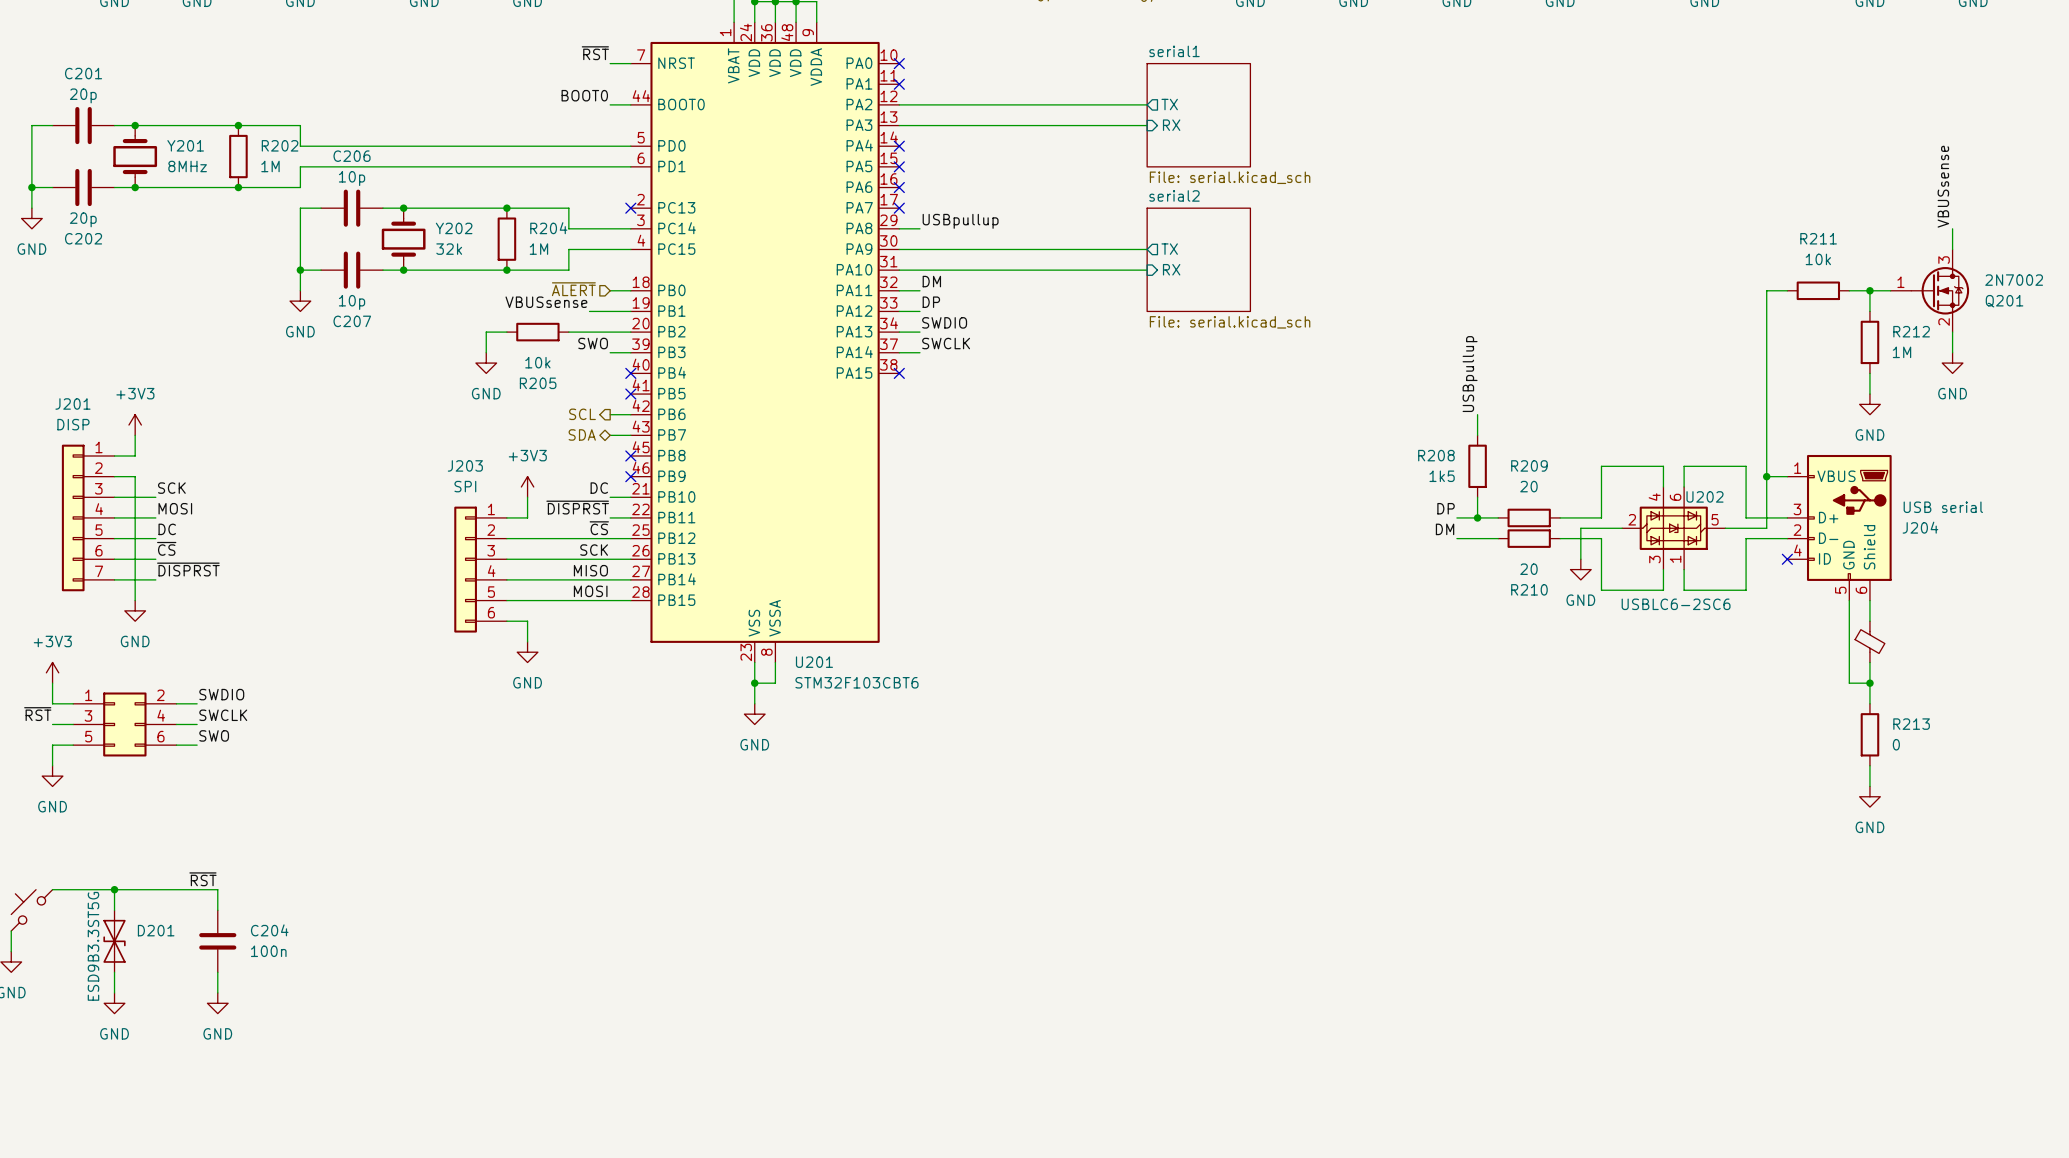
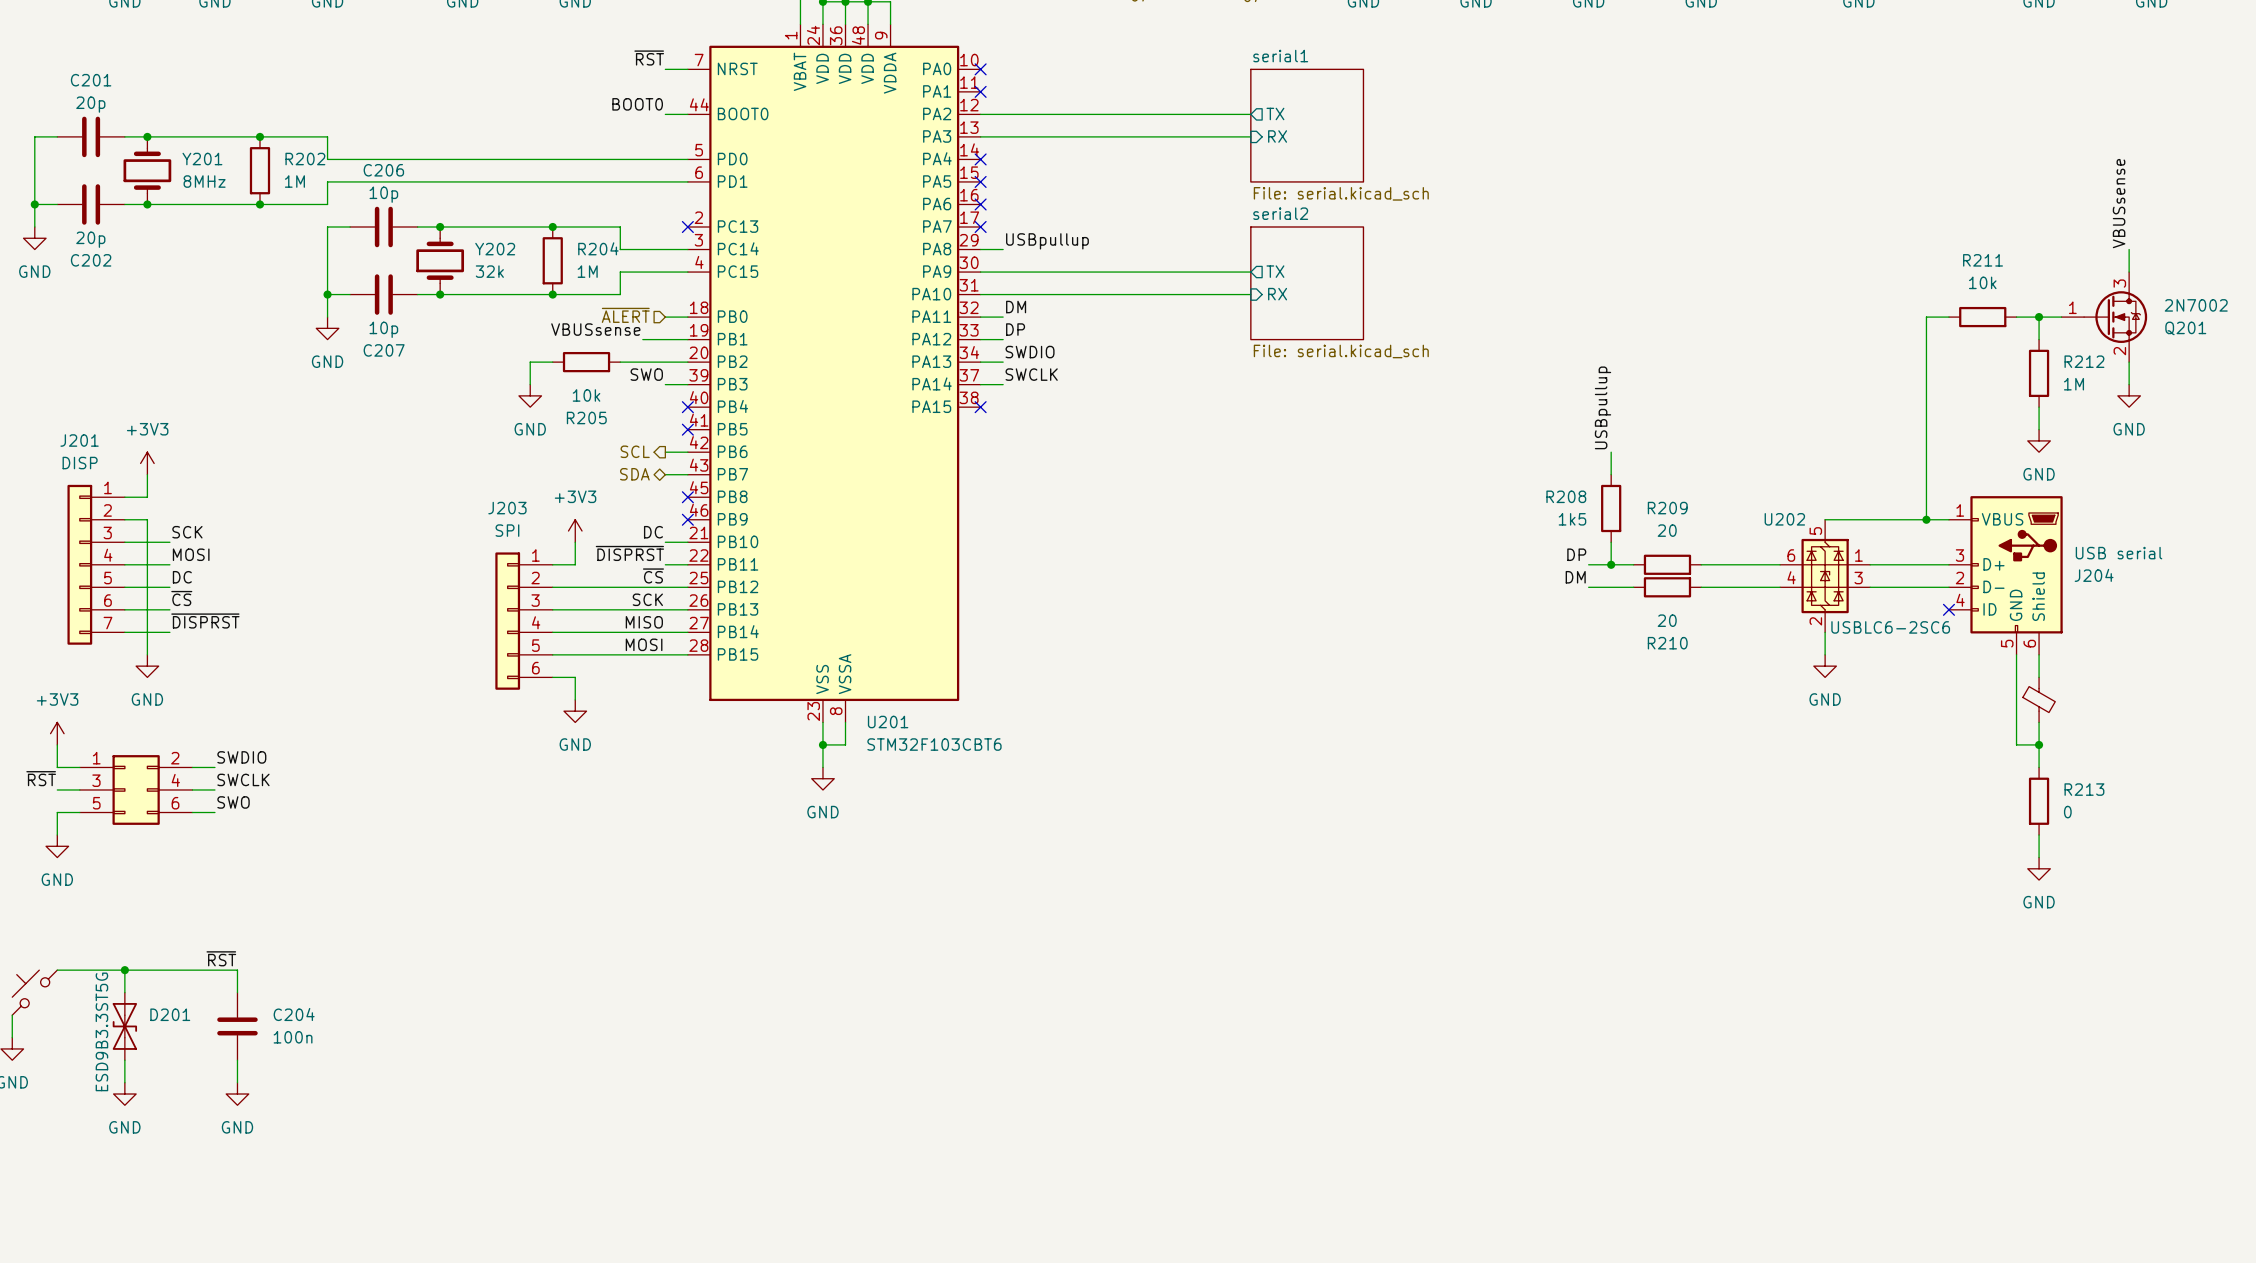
wire: (1766, 476) (1766, 528) (1725, 528) -> (1926, 519) (1825, 519)
wire: (1663, 486) (1663, 466) (1601, 466) (1601, 517) -> (1780, 564) (1746, 564)
wire: (1684, 486) (1684, 466) (1746, 466) (1746, 517) -> (1870, 564) (1903, 564)
U202 name position: U202 (1704, 496) -> U202 (1784, 519)
wire: (1622, 528) (1580, 528) (1580, 559) -> none
U202 rotation: 0° (1673, 528) -> 90° counterclockwise (1825, 576)
wire: (1601, 538) (1601, 590) (1663, 590) (1663, 569) -> (1746, 587) (1780, 587)
wire: (1746, 538) (1746, 590) (1684, 590) (1684, 569) -> (1903, 587) (1870, 587)
power symbol position: GND (1580, 569) -> GND (1825, 666)
wire: none -> (1825, 632) (1825, 654)
U202 value position: USBLC6-2SC6 (1676, 604) -> USBLC6-2SC6 (1890, 627)

